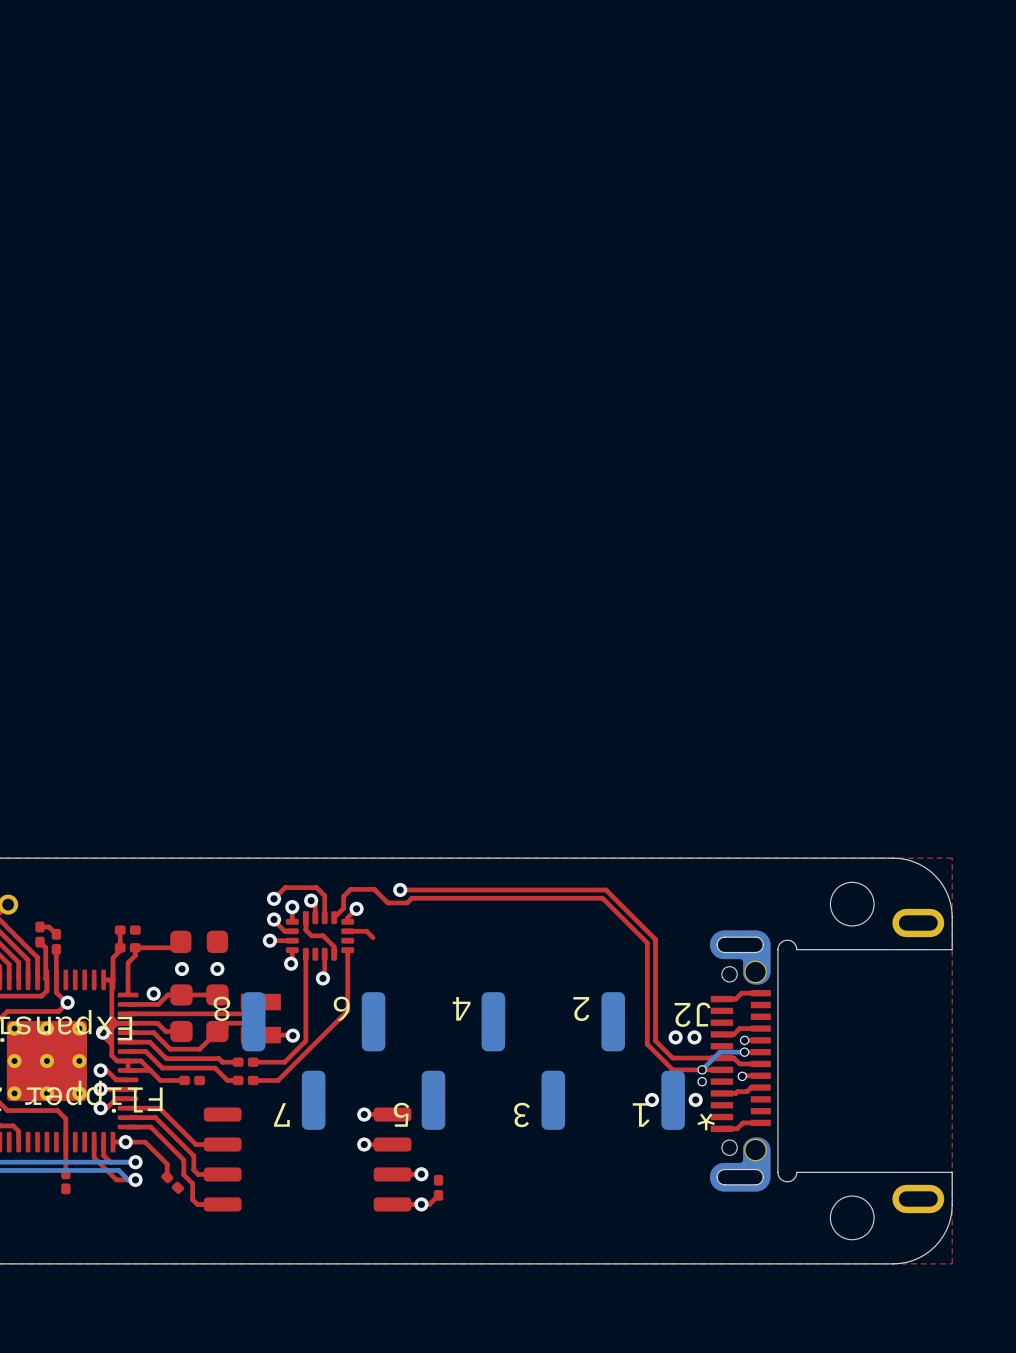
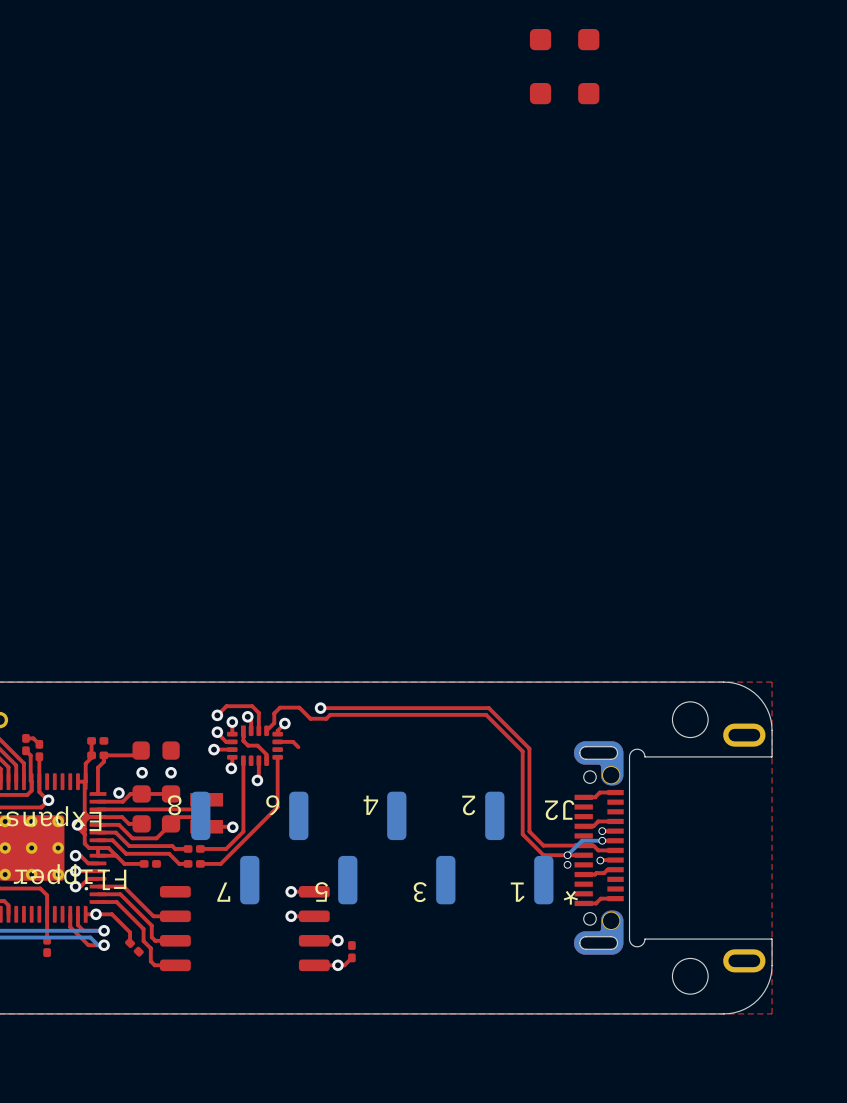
part: none -> (540, 66)
part: none -> (588, 66)
via: (675, 1037) -> none
via: (694, 1037) -> none
via: (652, 1099) -> none
via: (695, 1099) -> none

